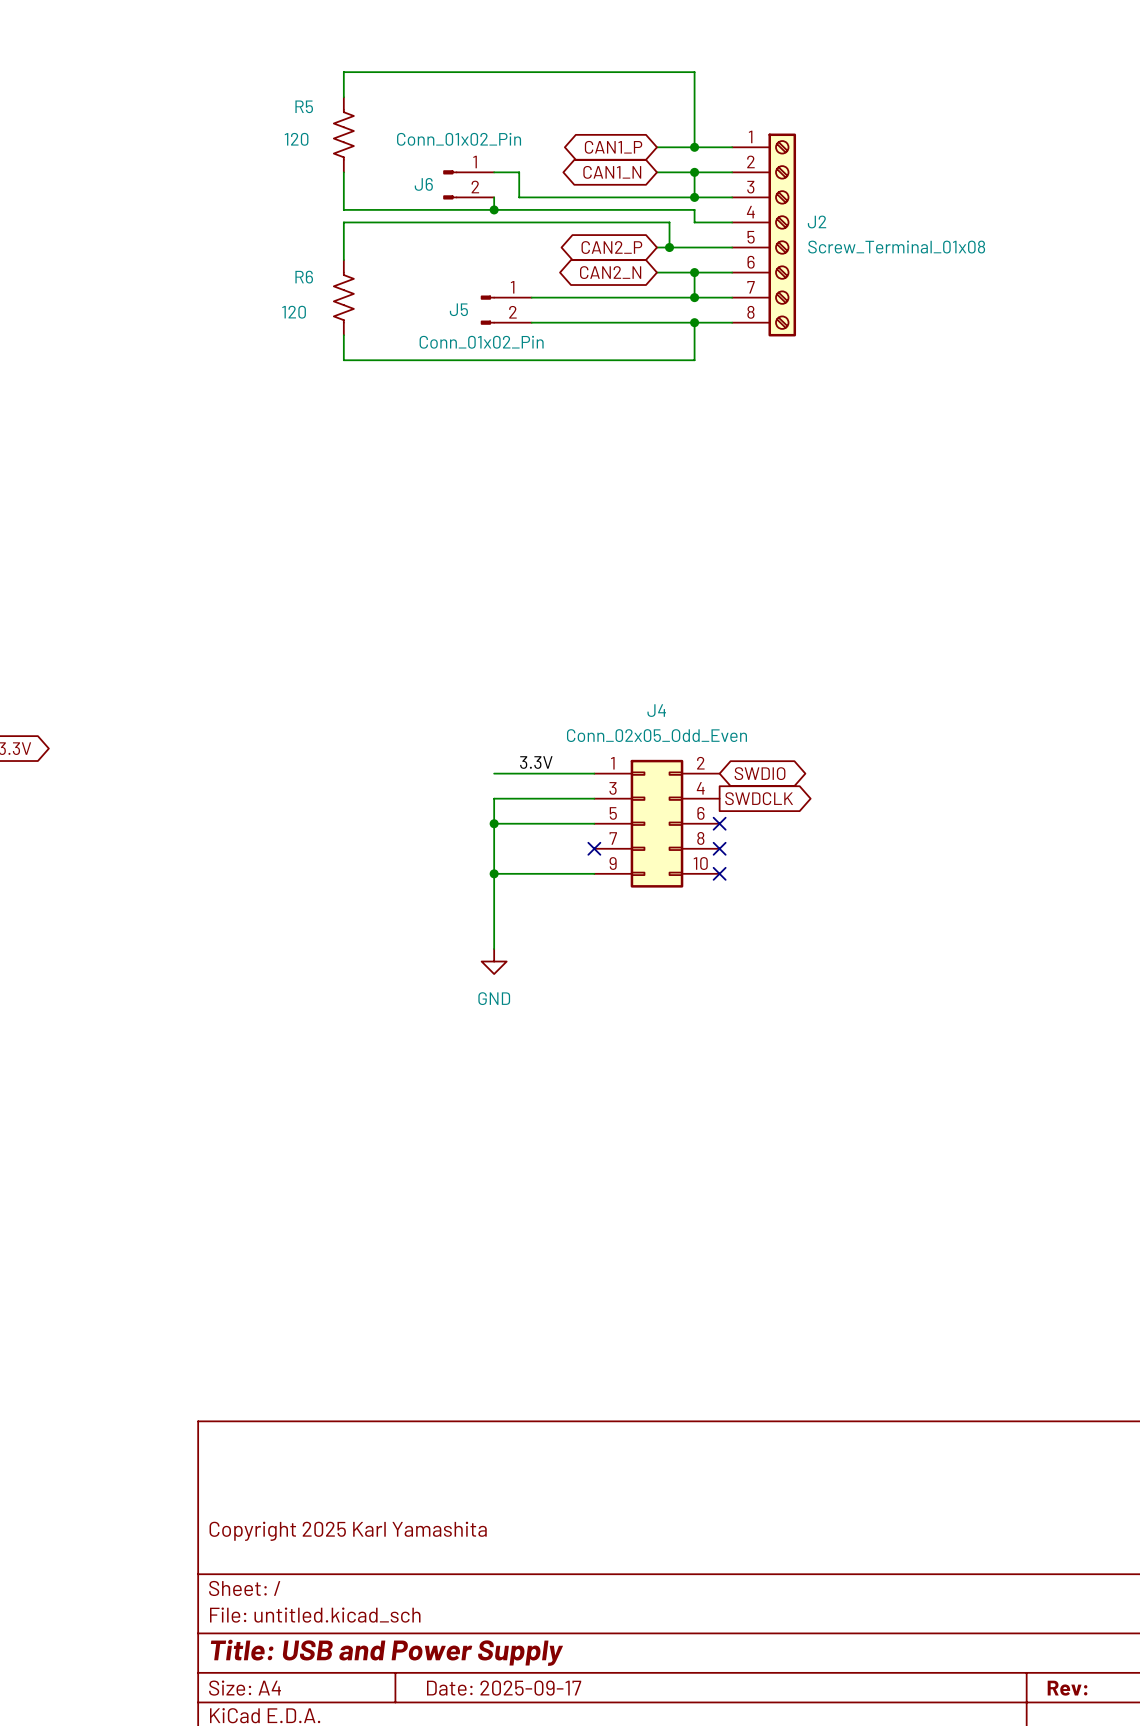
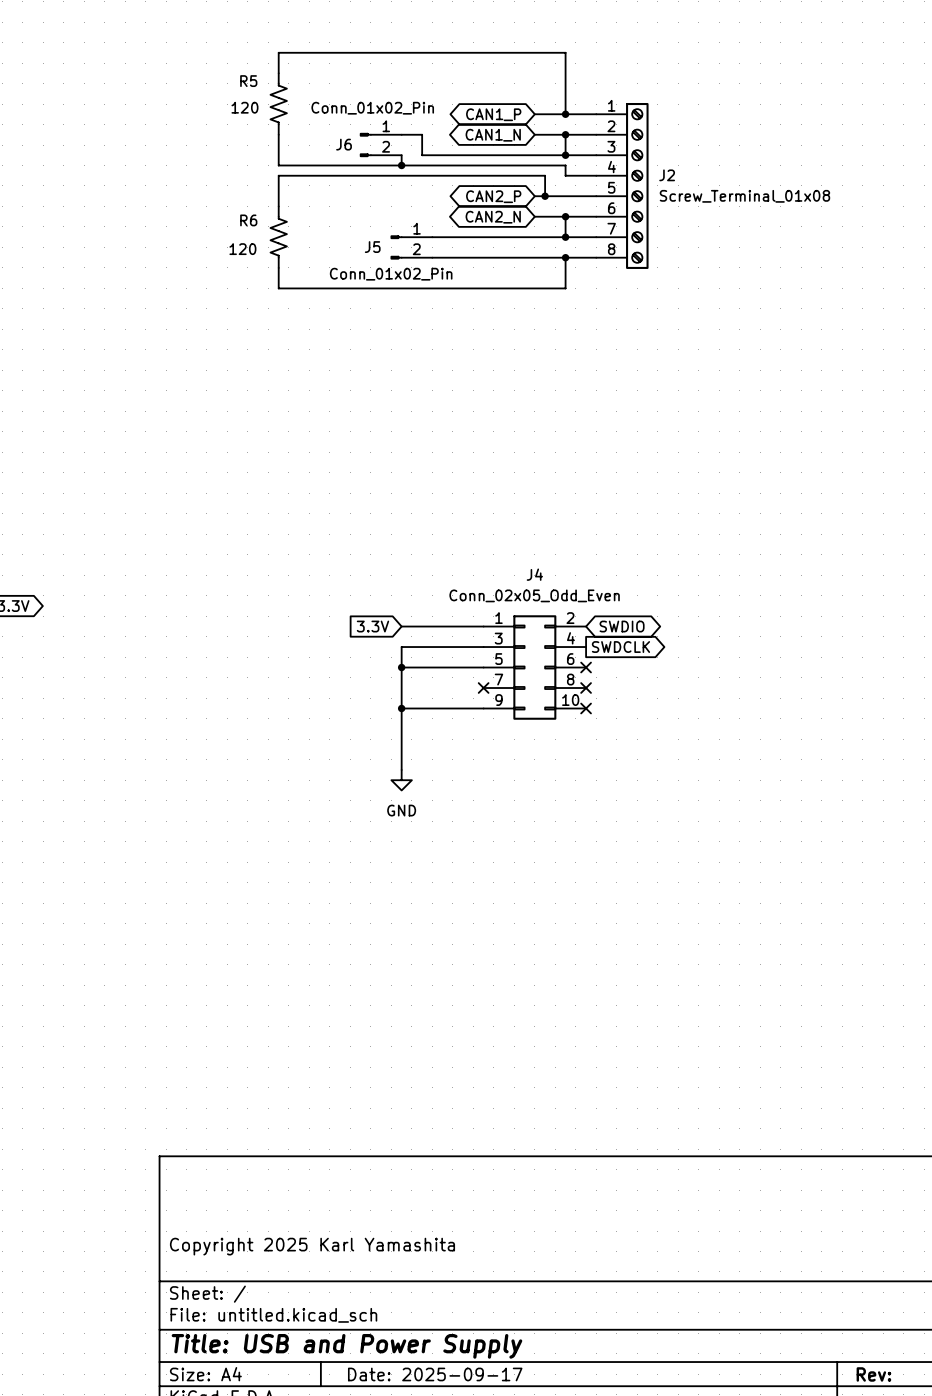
label: 3.3V (536, 762) -> none
global label: none -> 3.3V (372, 626)

